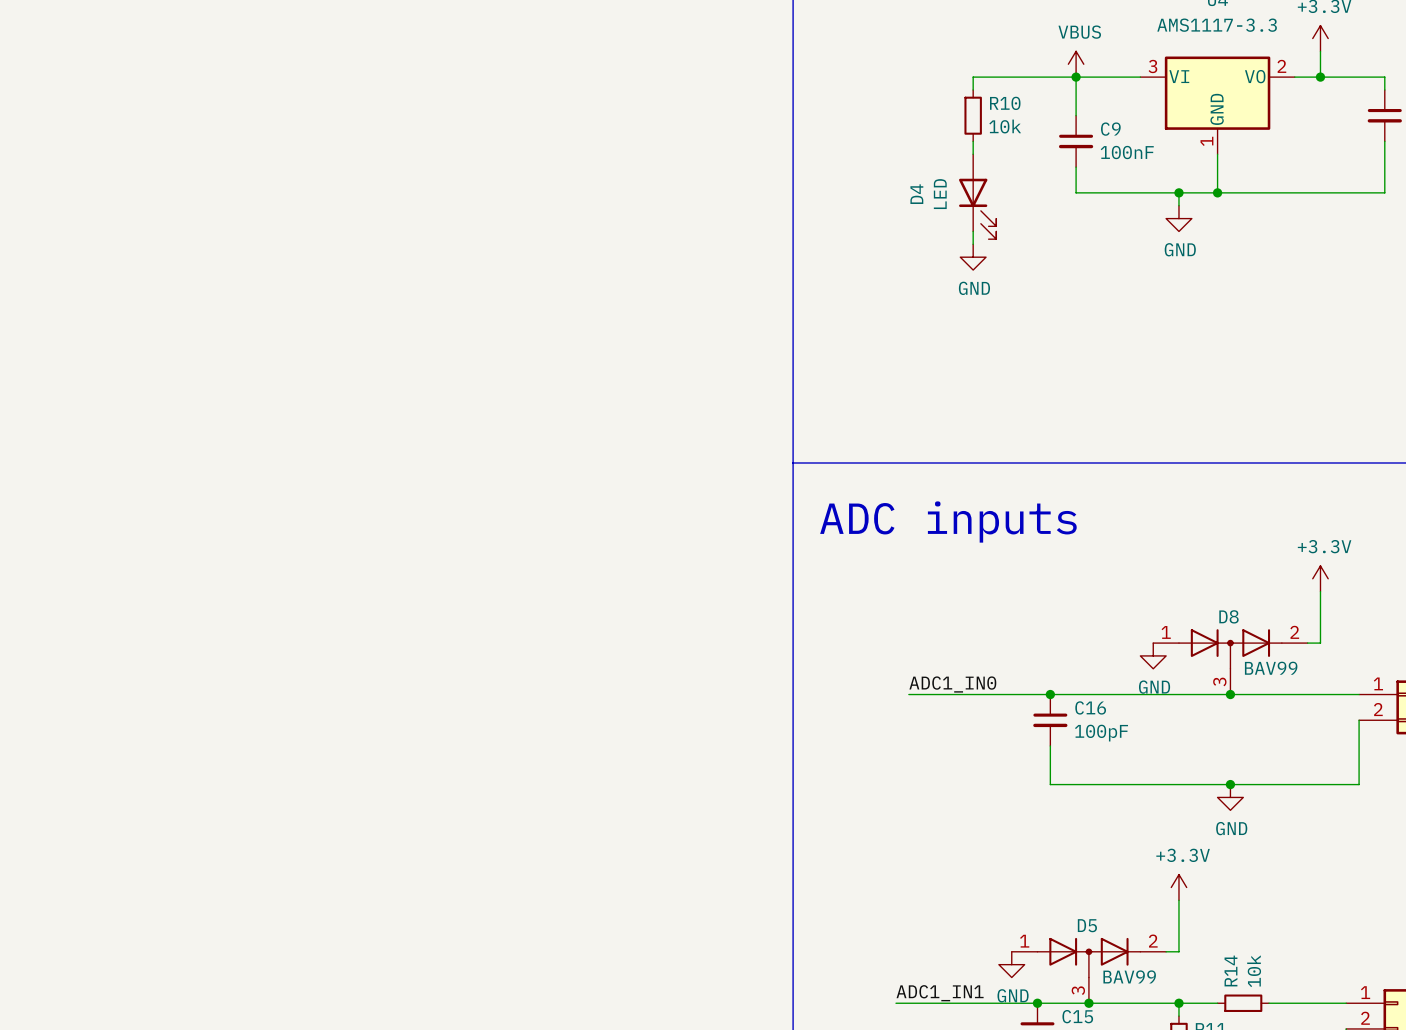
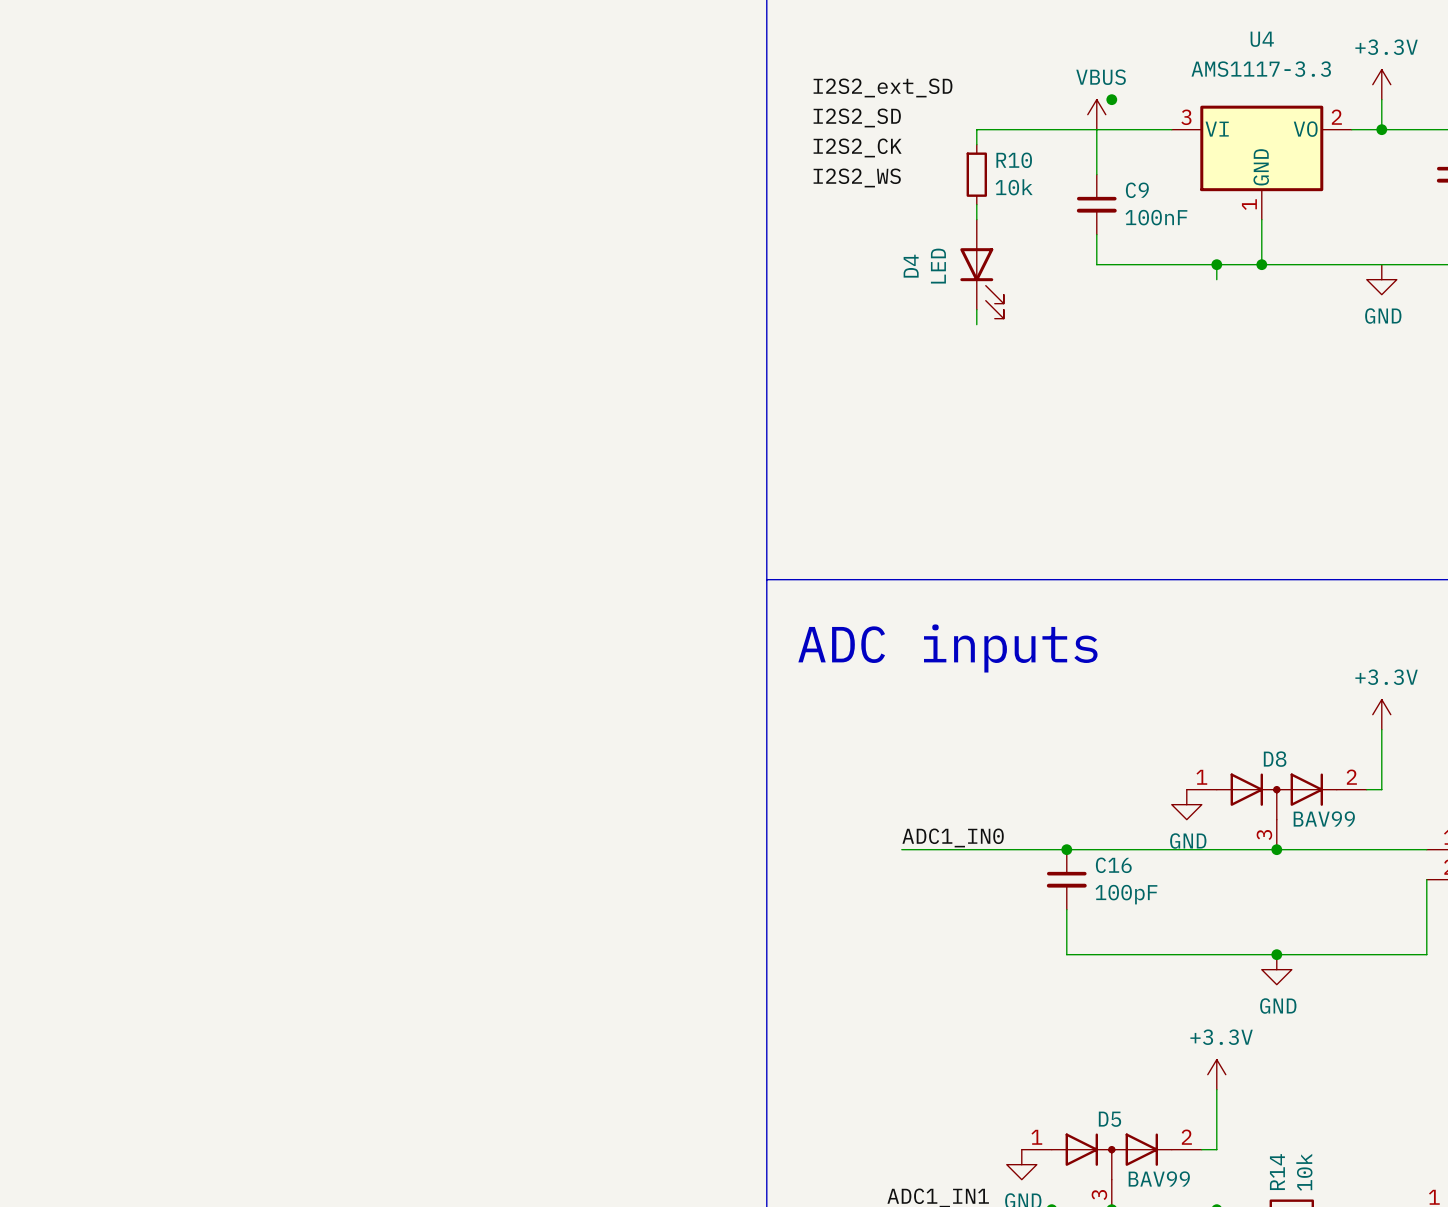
label: none -> I2S2_ext_SD (883, 87)
label: none -> I2S2_SD (857, 117)
junction position: (1076, 77) -> (1111, 99)
label: none -> I2S2_CK (857, 147)
label: none -> I2S2_WS (857, 177)
power symbol position: GND (1178, 218) -> GND (1381, 279)
power symbol: GND (973, 257) -> none

